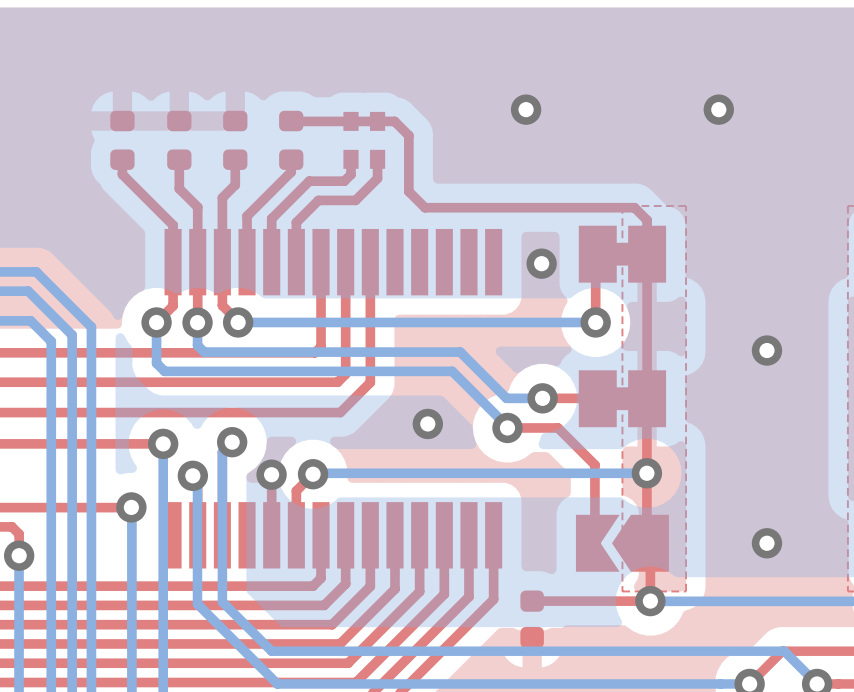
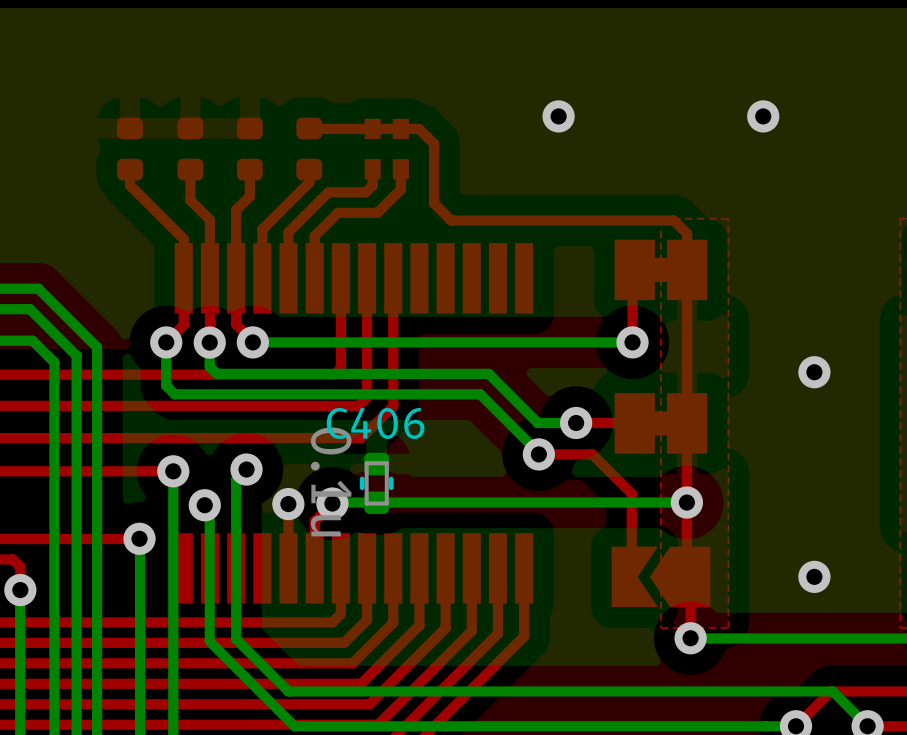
via: (541, 263) -> none
via: (427, 423) -> none
top track: (650, 601) (532, 601) -> none
C406 side: top (532, 619) -> bottom (376, 483)

